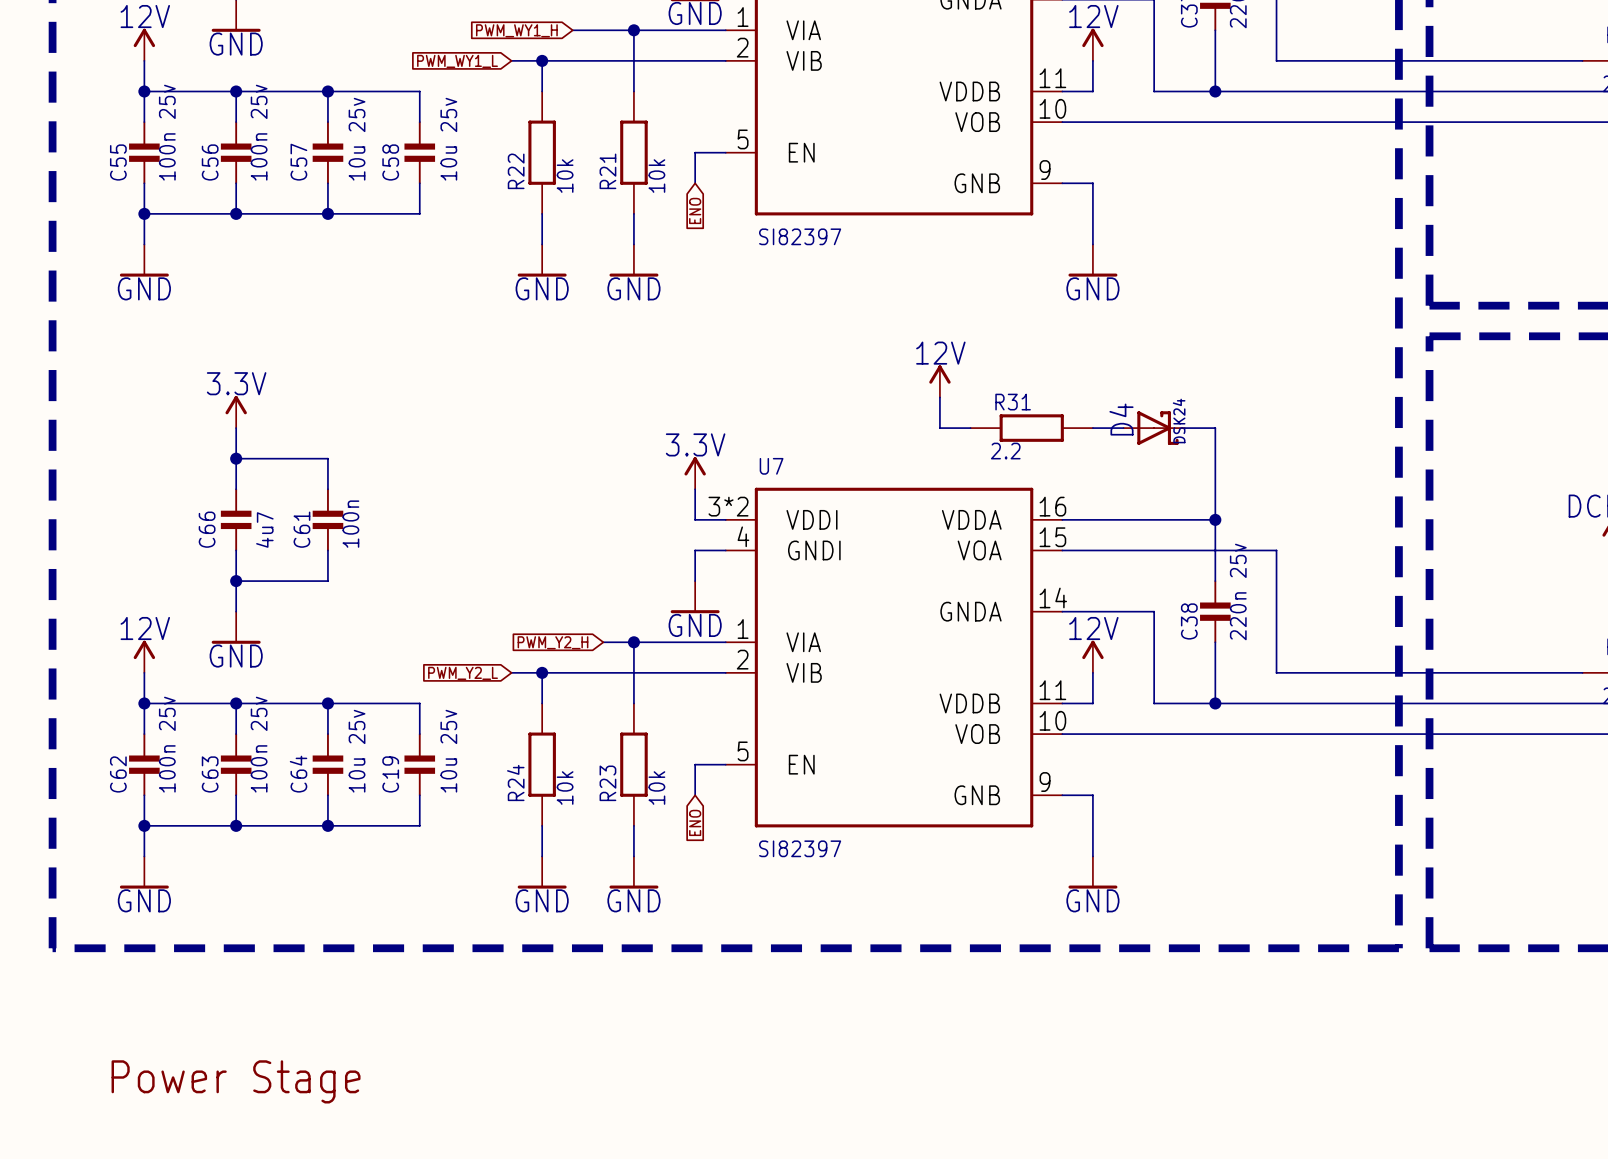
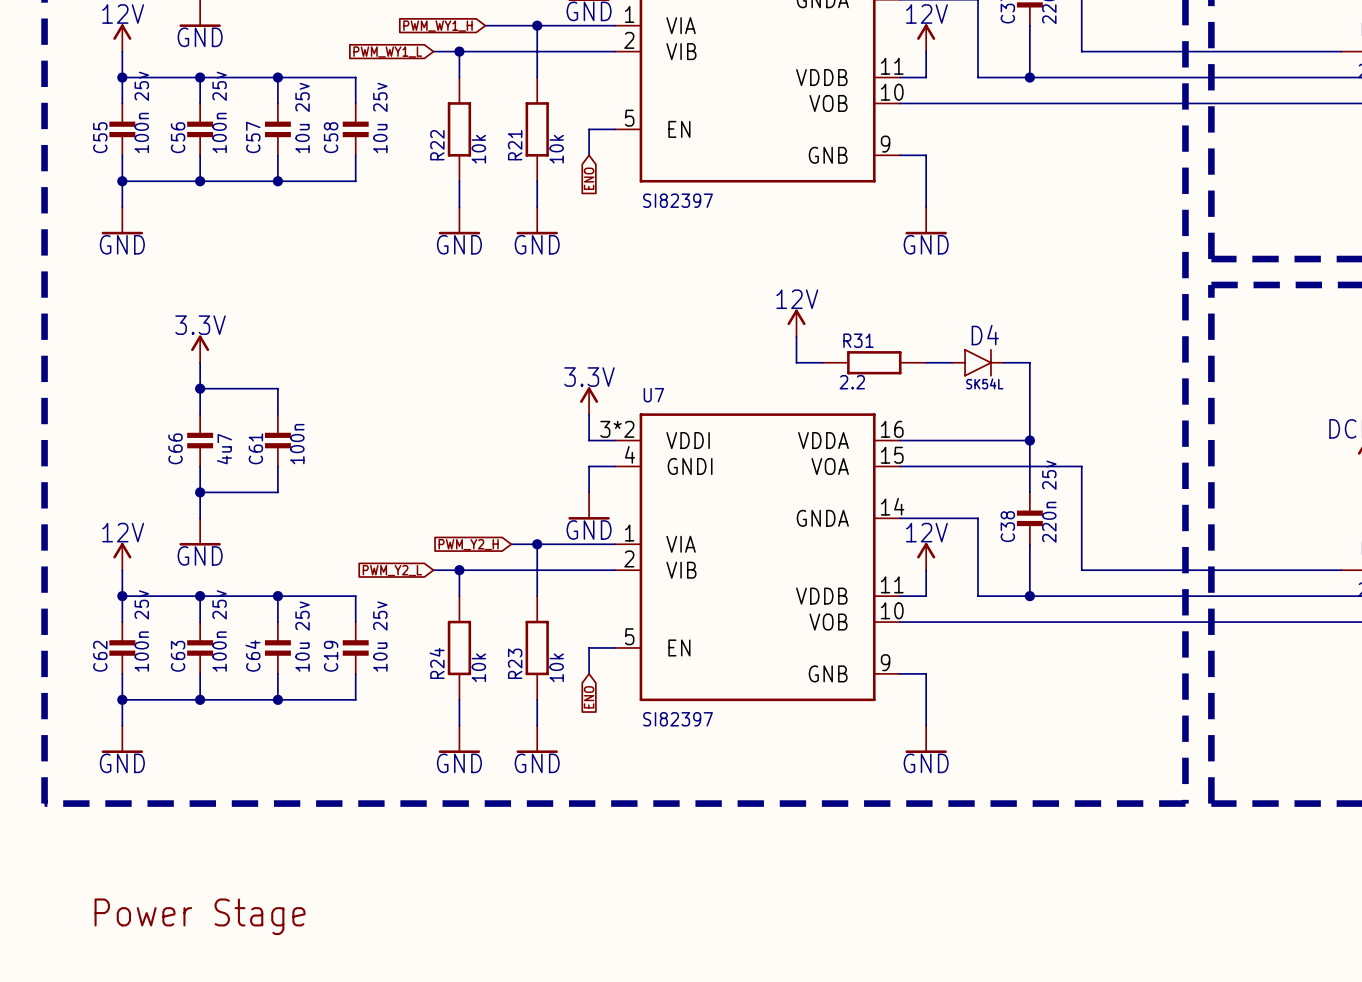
D4 symbol: [1123, 411, 1185, 445] -> [951, 349, 1005, 377]
D4 name position: D4 (1121, 419) -> D4 (985, 335)
D4 value: DSK24 (1179, 420) -> SK54L (984, 383)

